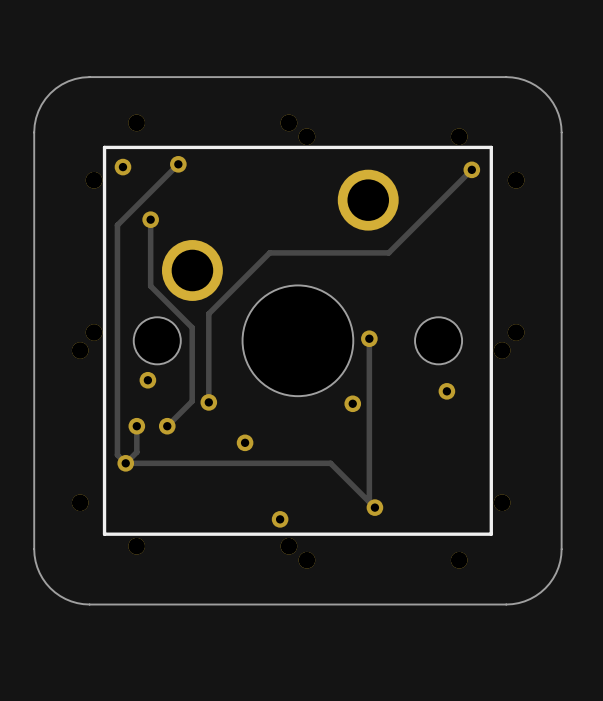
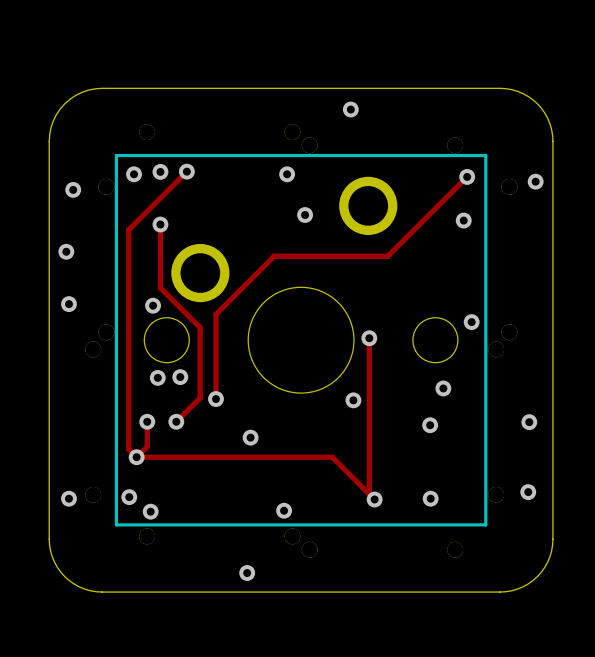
via: none -> (350, 109)
via: none -> (160, 171)
via: none -> (287, 174)
via: none -> (535, 181)
via: none -> (73, 189)
via: none -> (305, 215)
via: none -> (463, 220)
via: none -> (66, 251)
via: none -> (68, 304)
via: none -> (153, 305)
via: none -> (471, 322)
via: none -> (180, 377)
via: none -> (529, 422)
via: none -> (430, 425)
via: none -> (528, 492)
via: none -> (129, 497)
via: none -> (68, 498)
via: none -> (430, 498)
via: none -> (150, 511)
via: none -> (247, 573)

